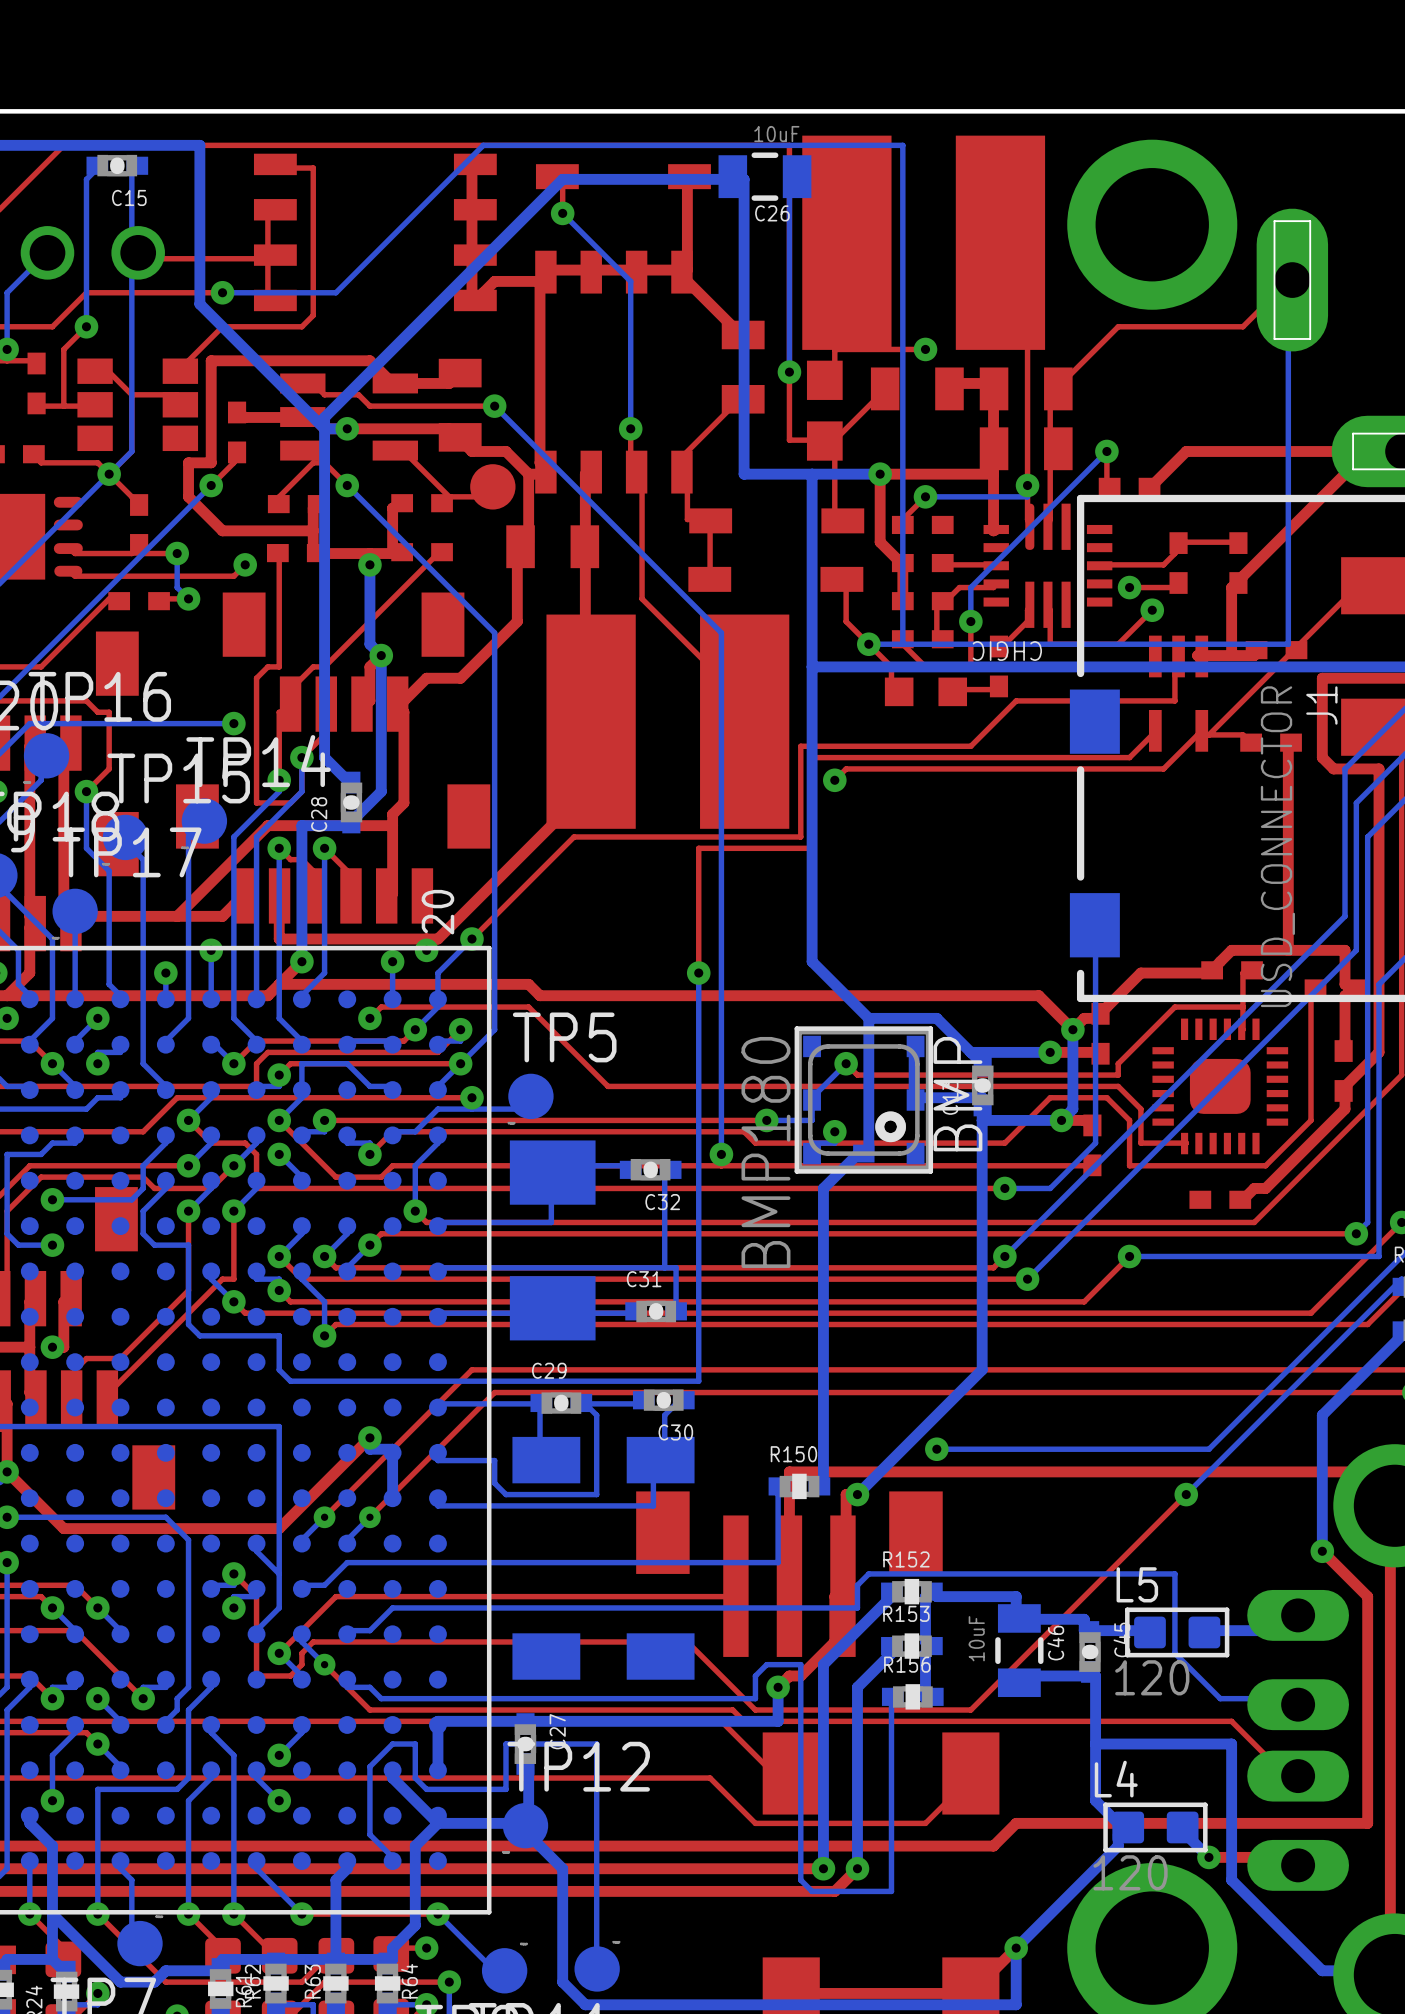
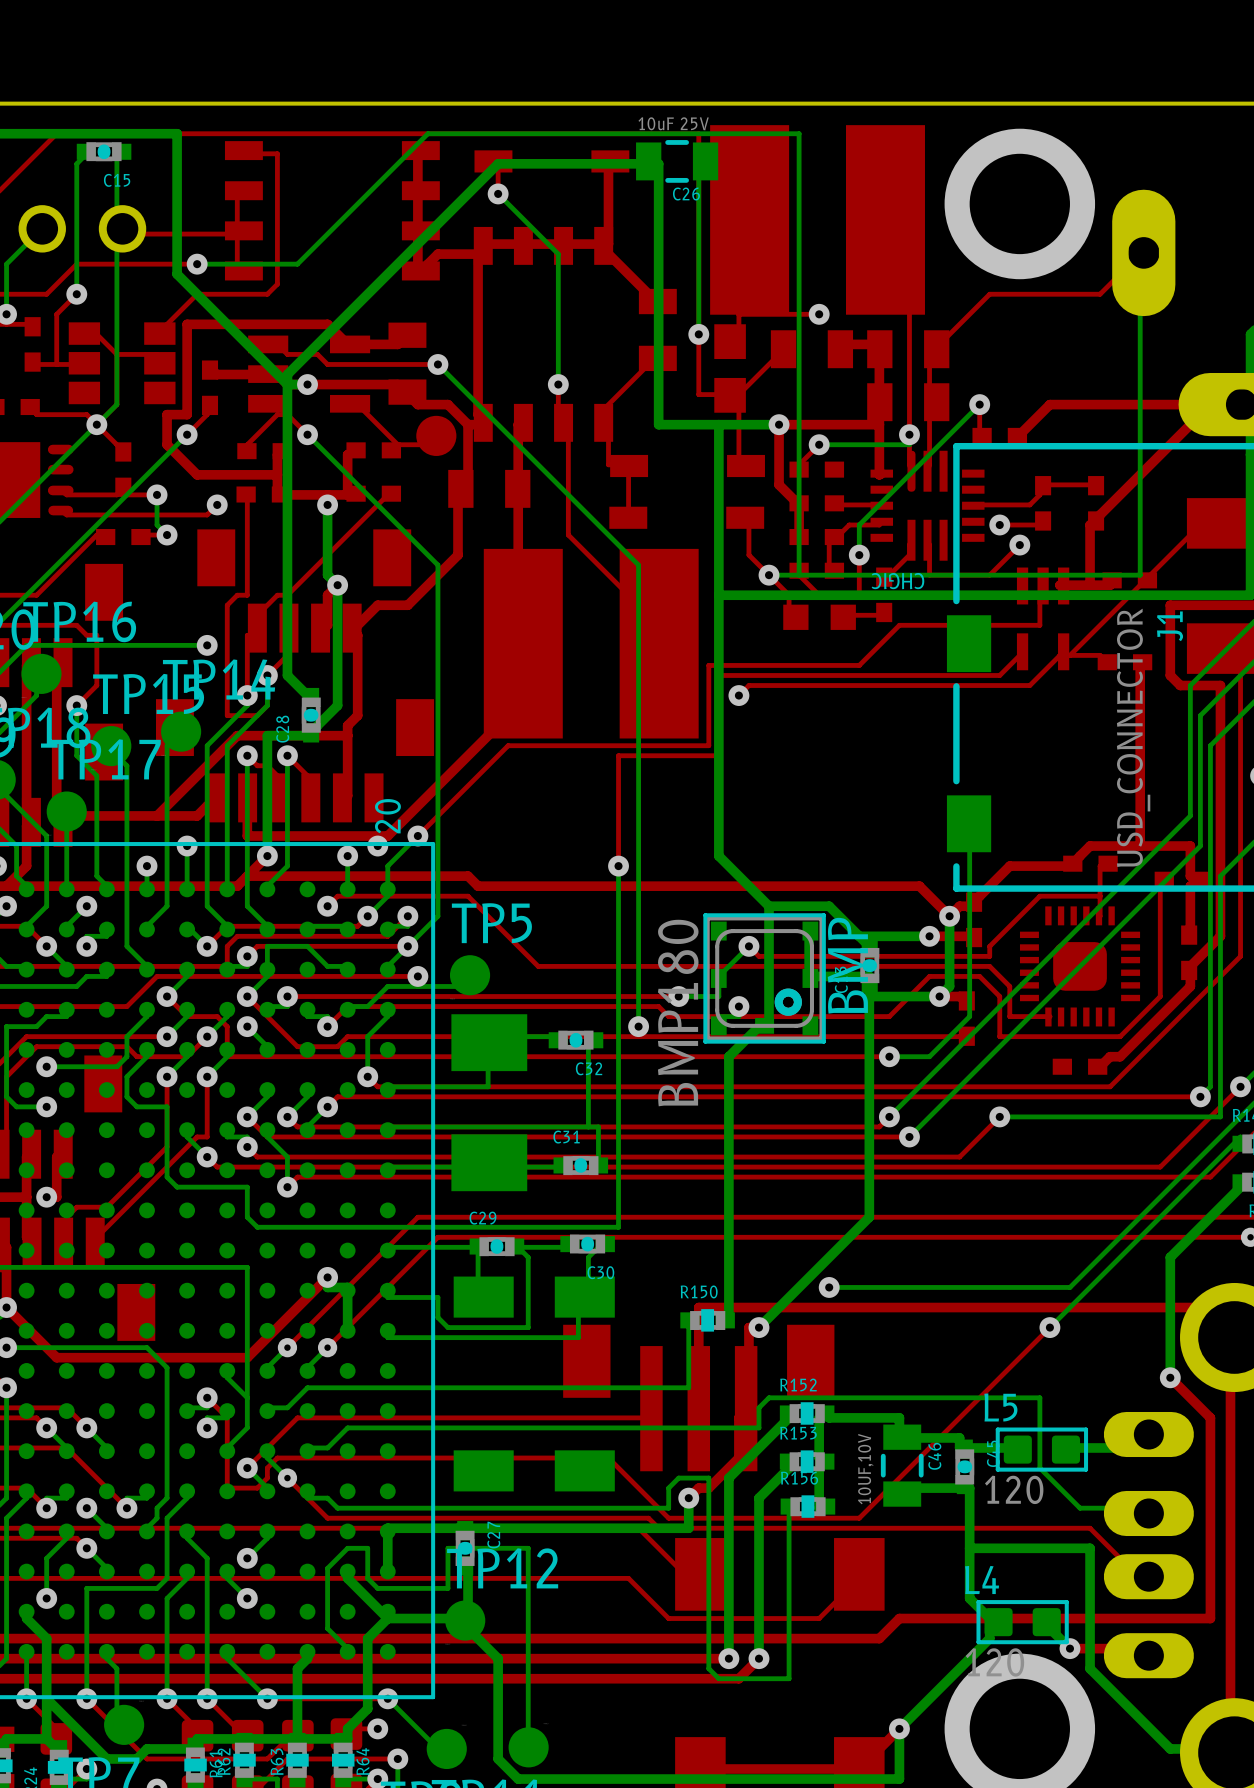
C26 value: 10uF (776, 134) -> 10uF 25V (673, 123)
C46 value: 10uF (976, 1638) -> 10UF,10V (865, 1469)

